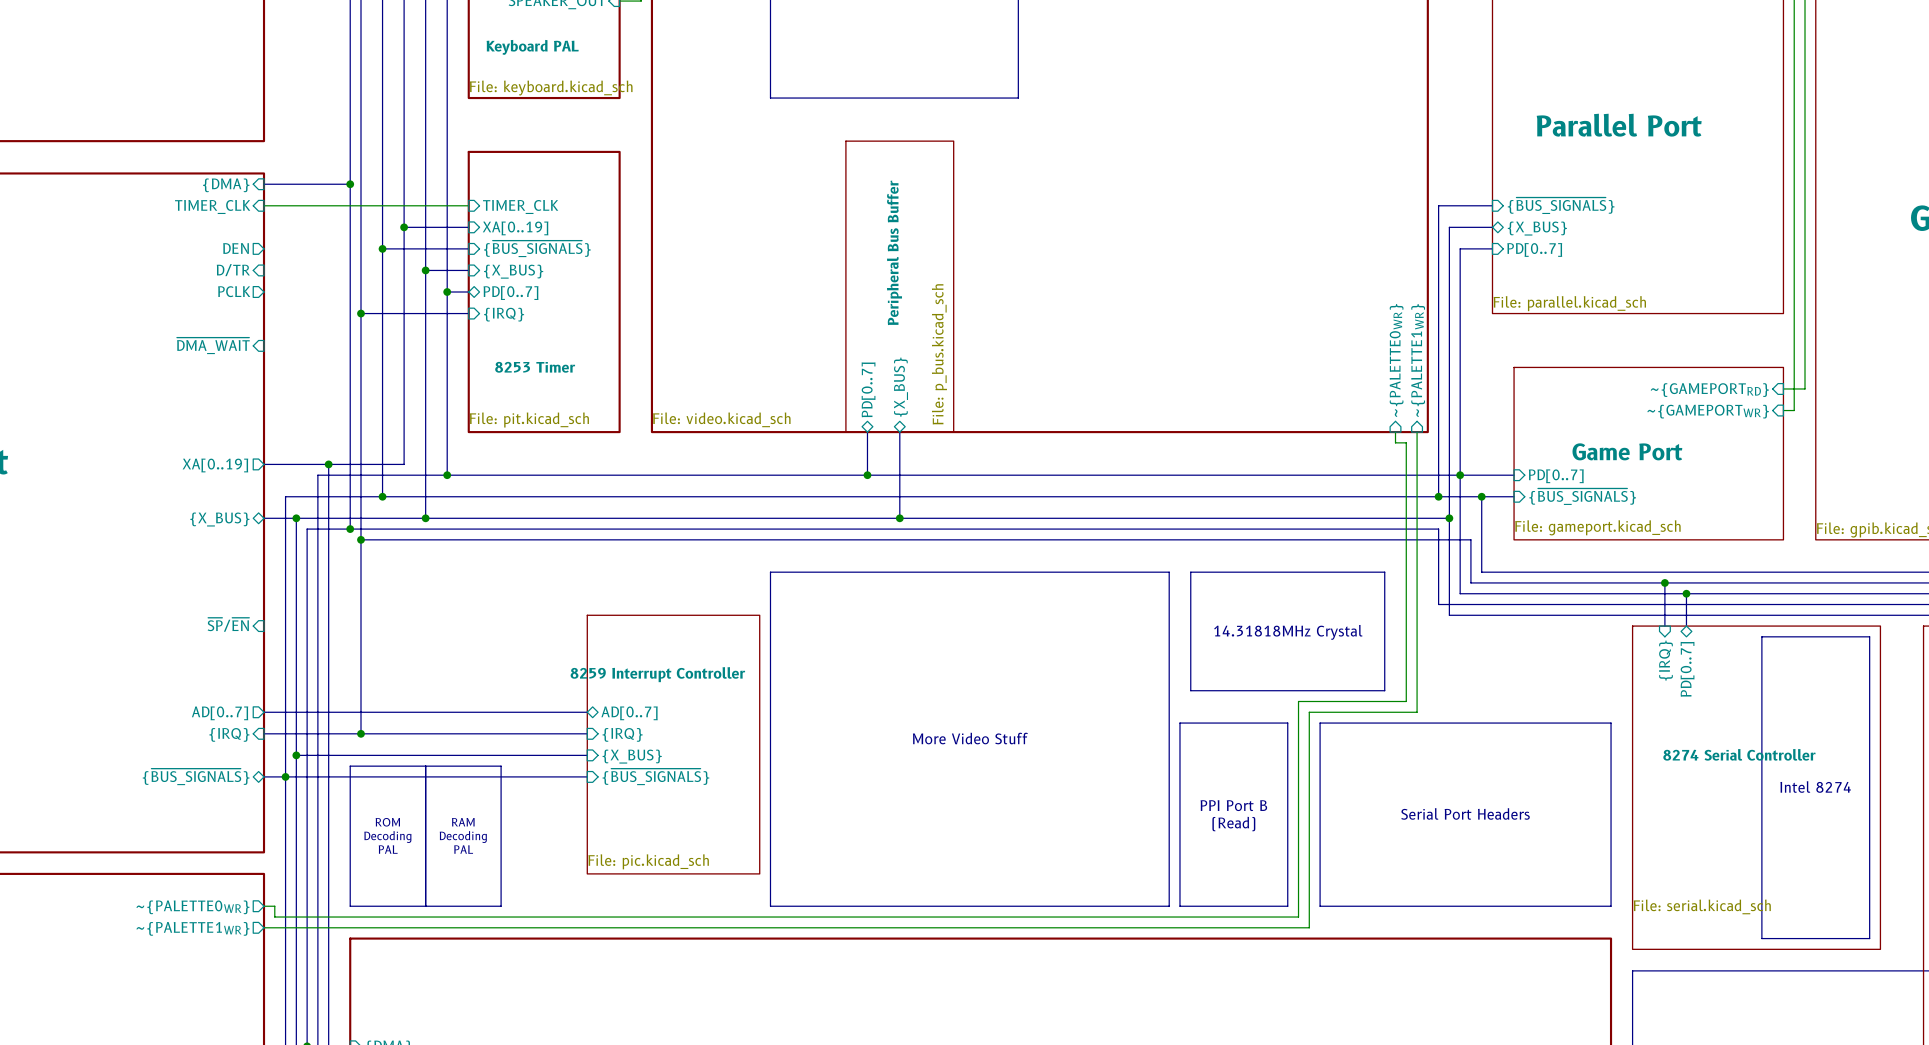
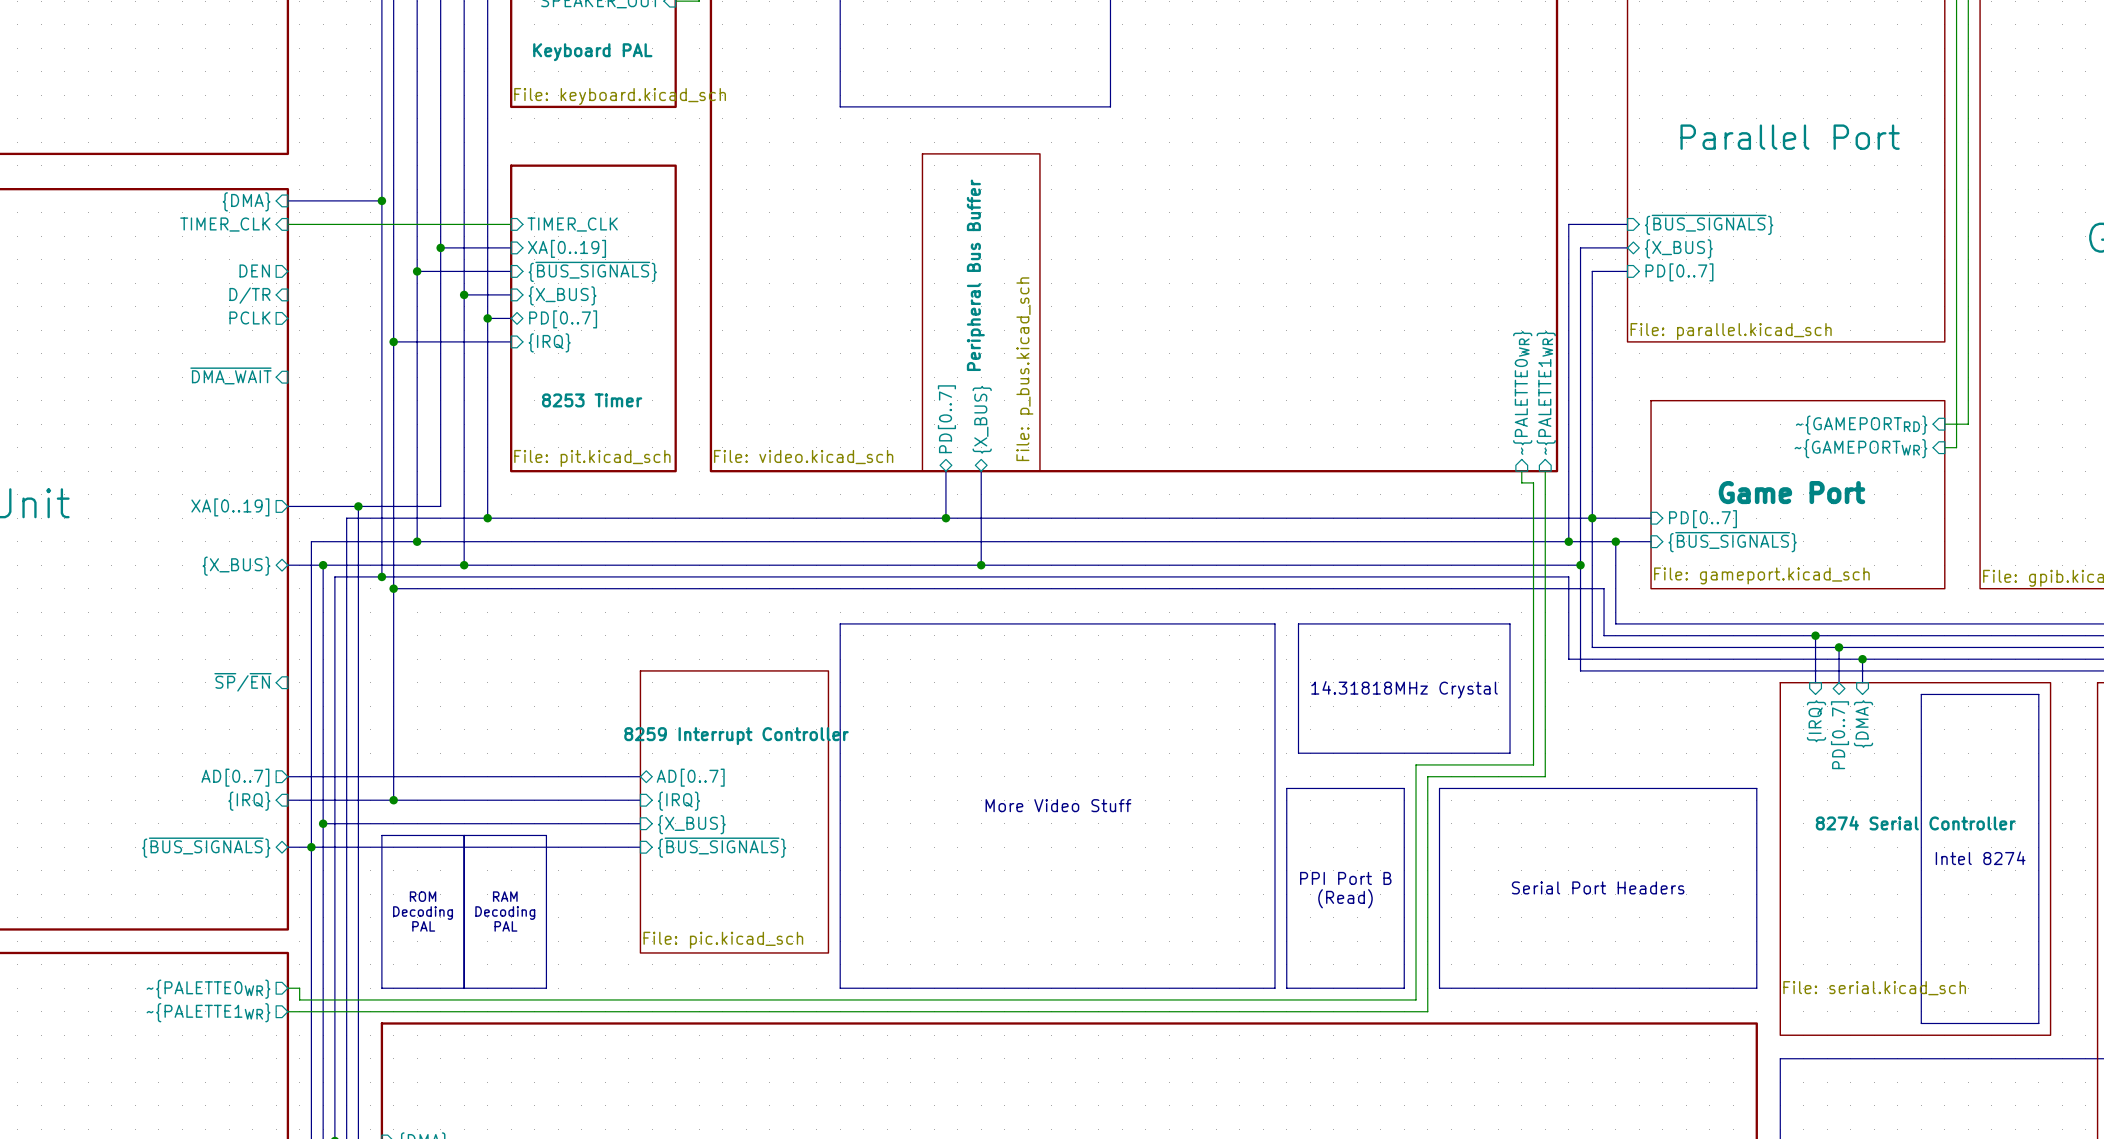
bus: none -> (1862, 659) (1862, 682)
junction: none -> (1862, 659)
sheet pin: none -> {DMA} (1863, 724)

